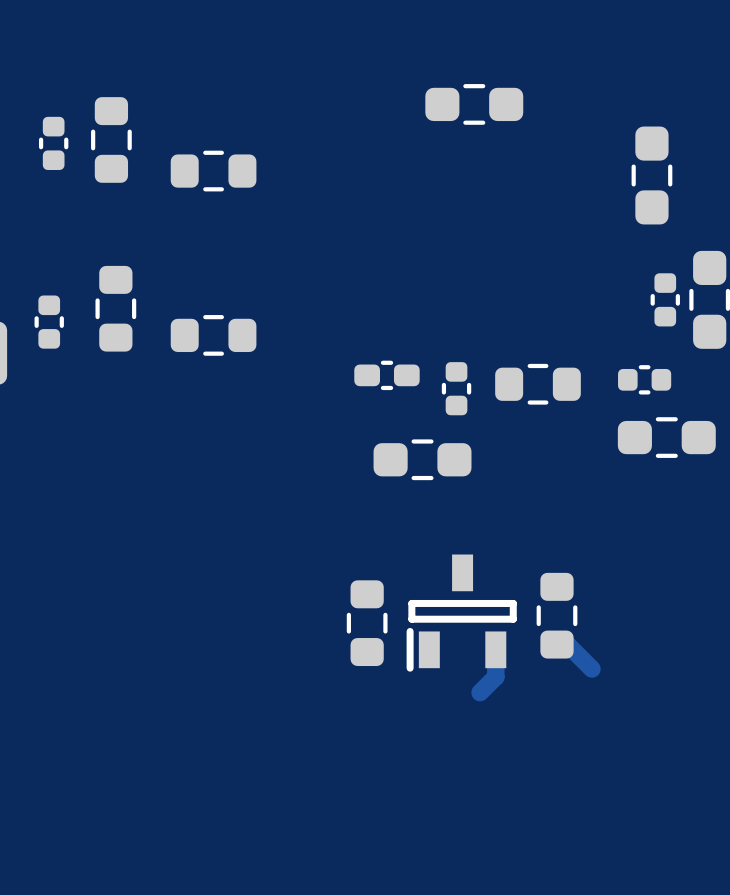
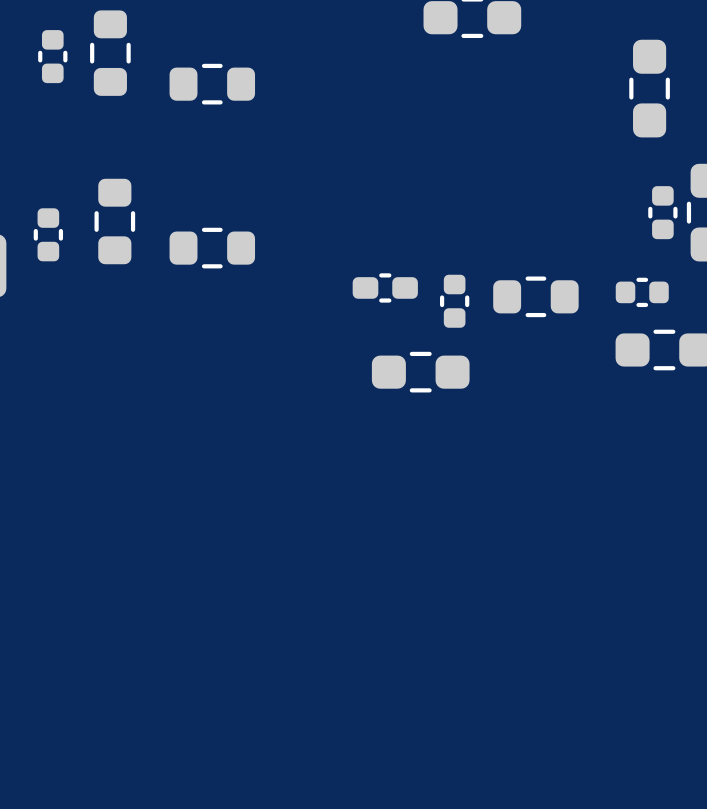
part: (461, 613) -> none
part: (557, 615) -> none
part: (367, 623) -> none
track: (557, 644) (567, 644) (591, 669) -> none
track: (495, 649) (495, 676) (480, 692) -> none

